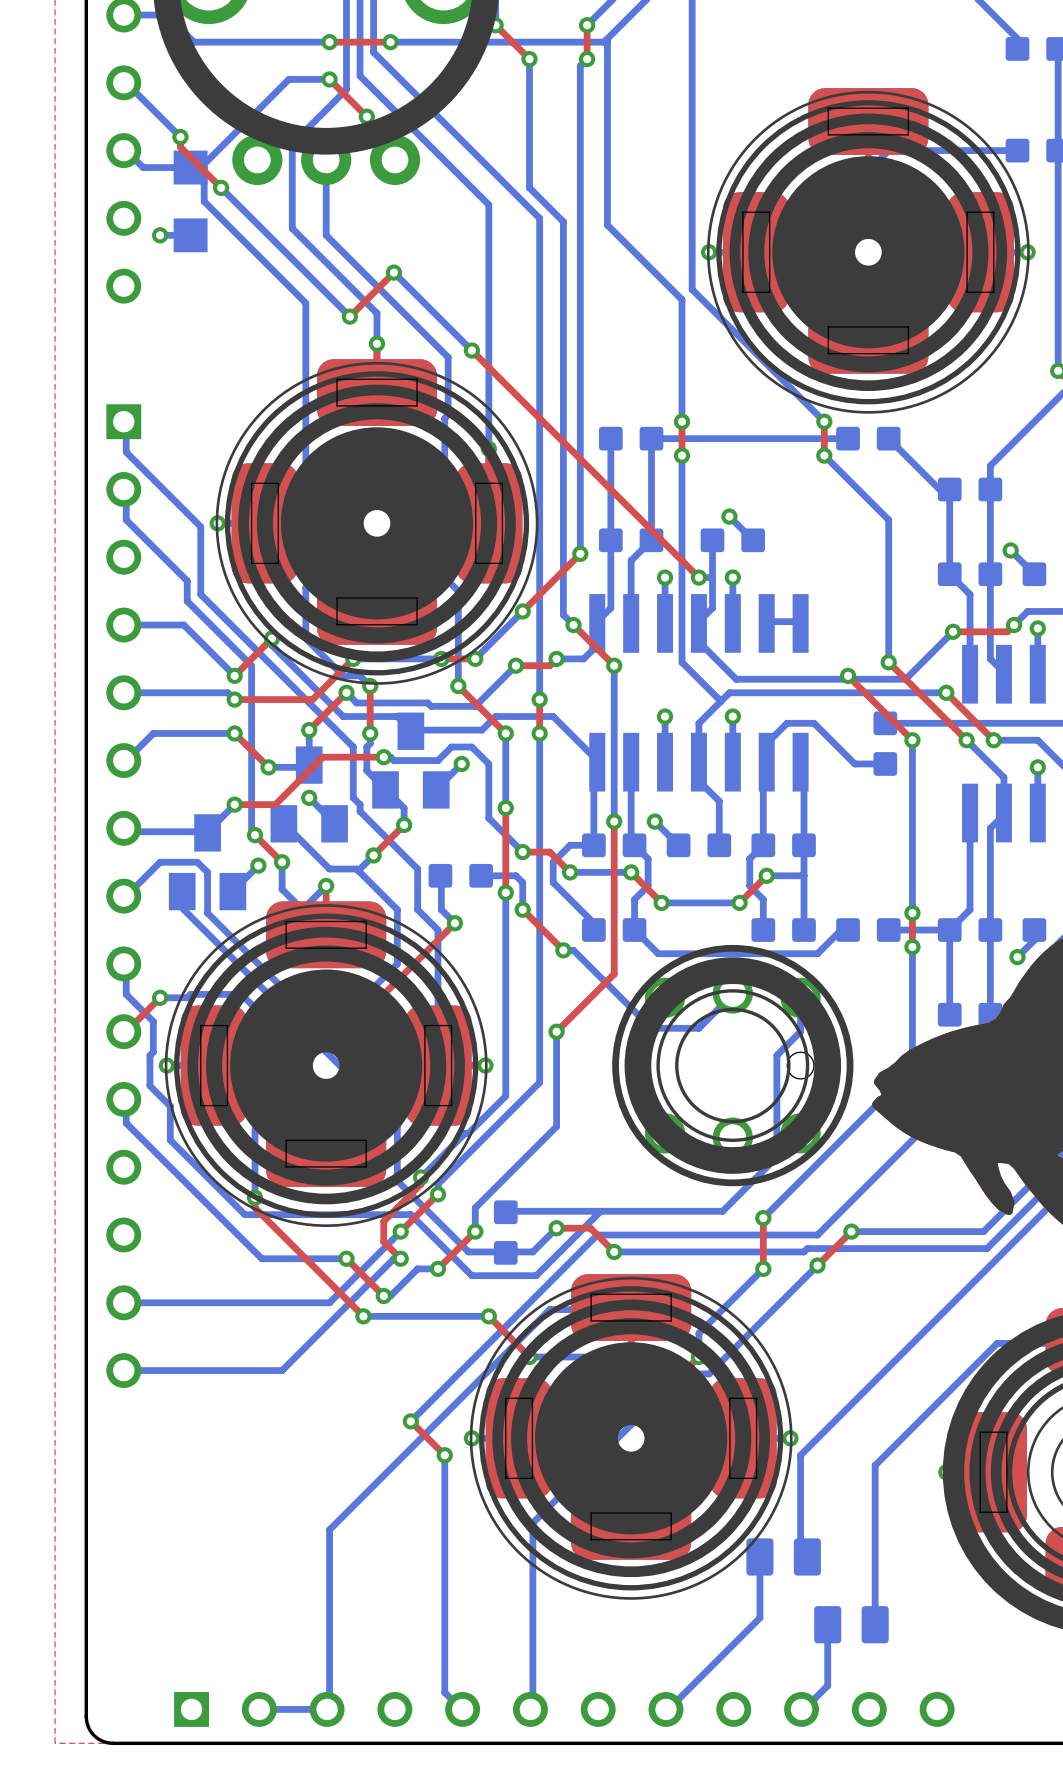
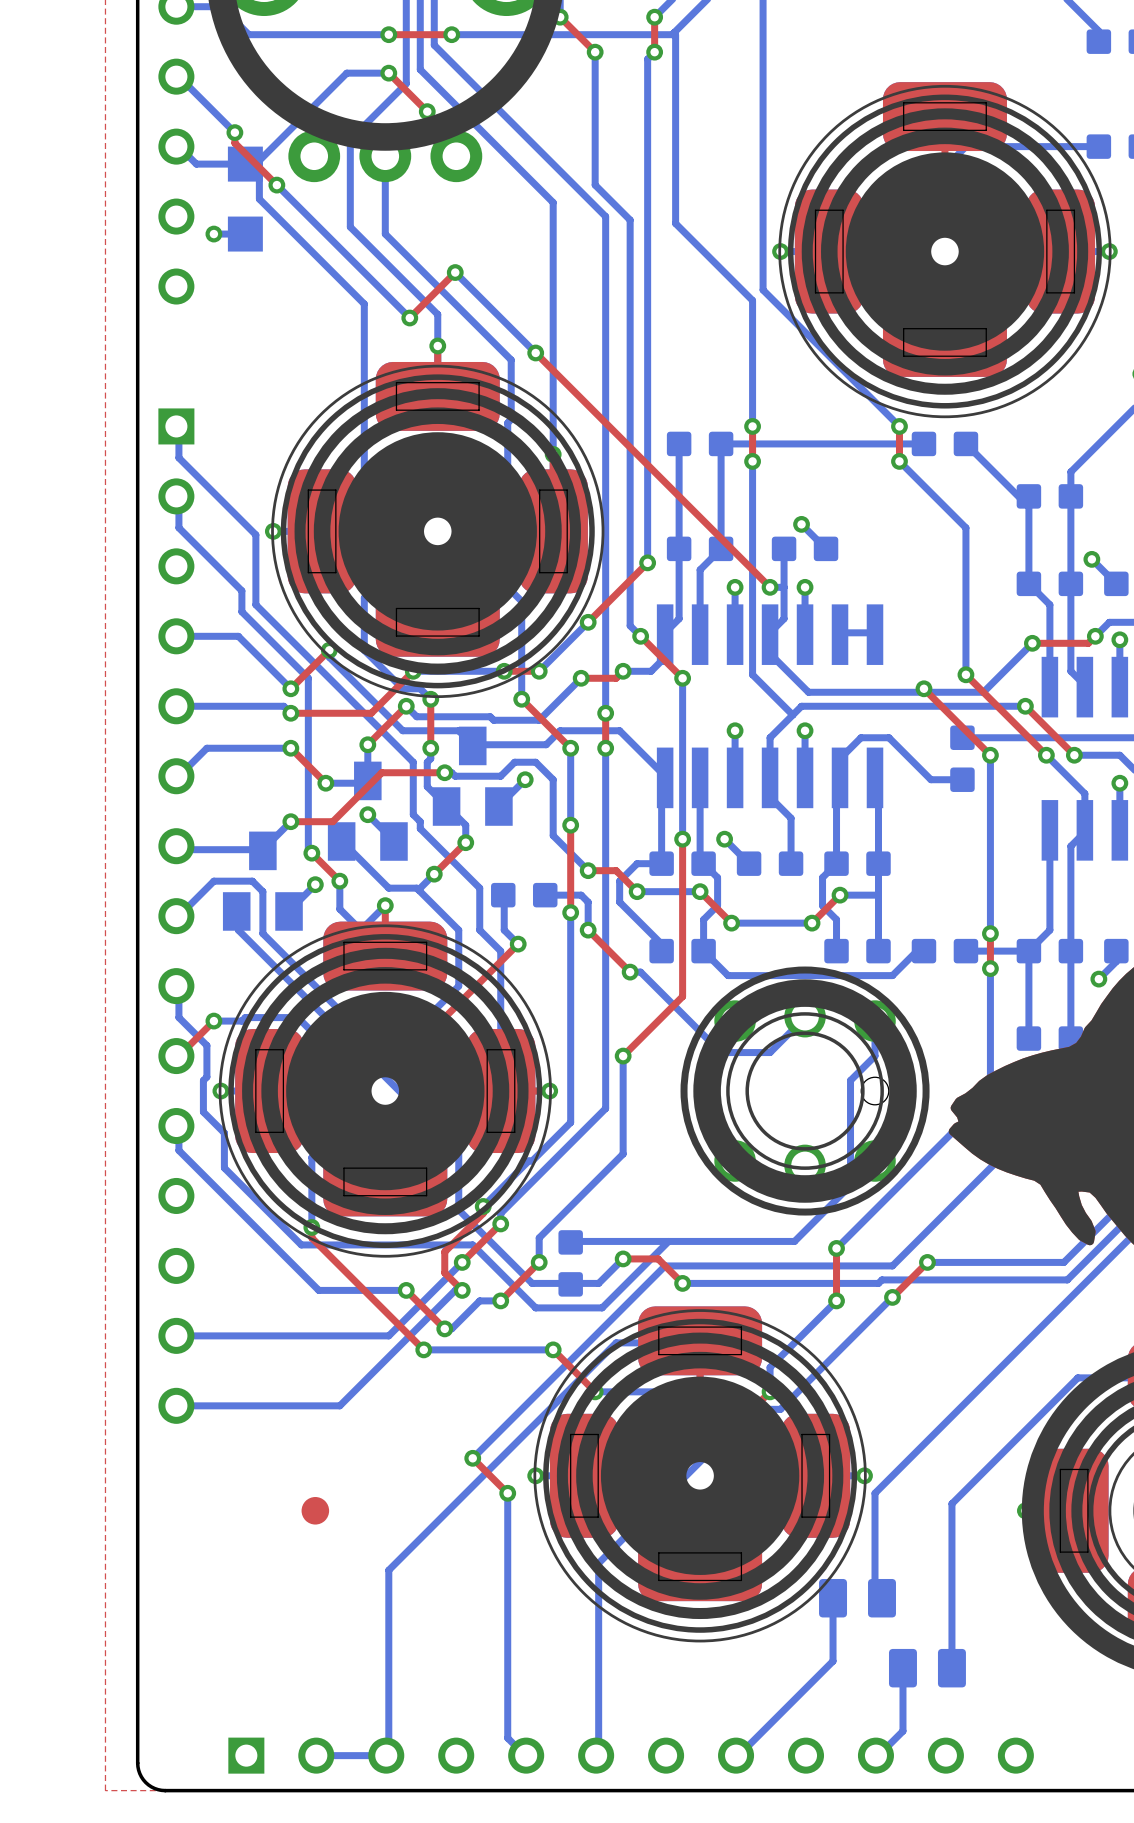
part: none -> (315, 1510)

